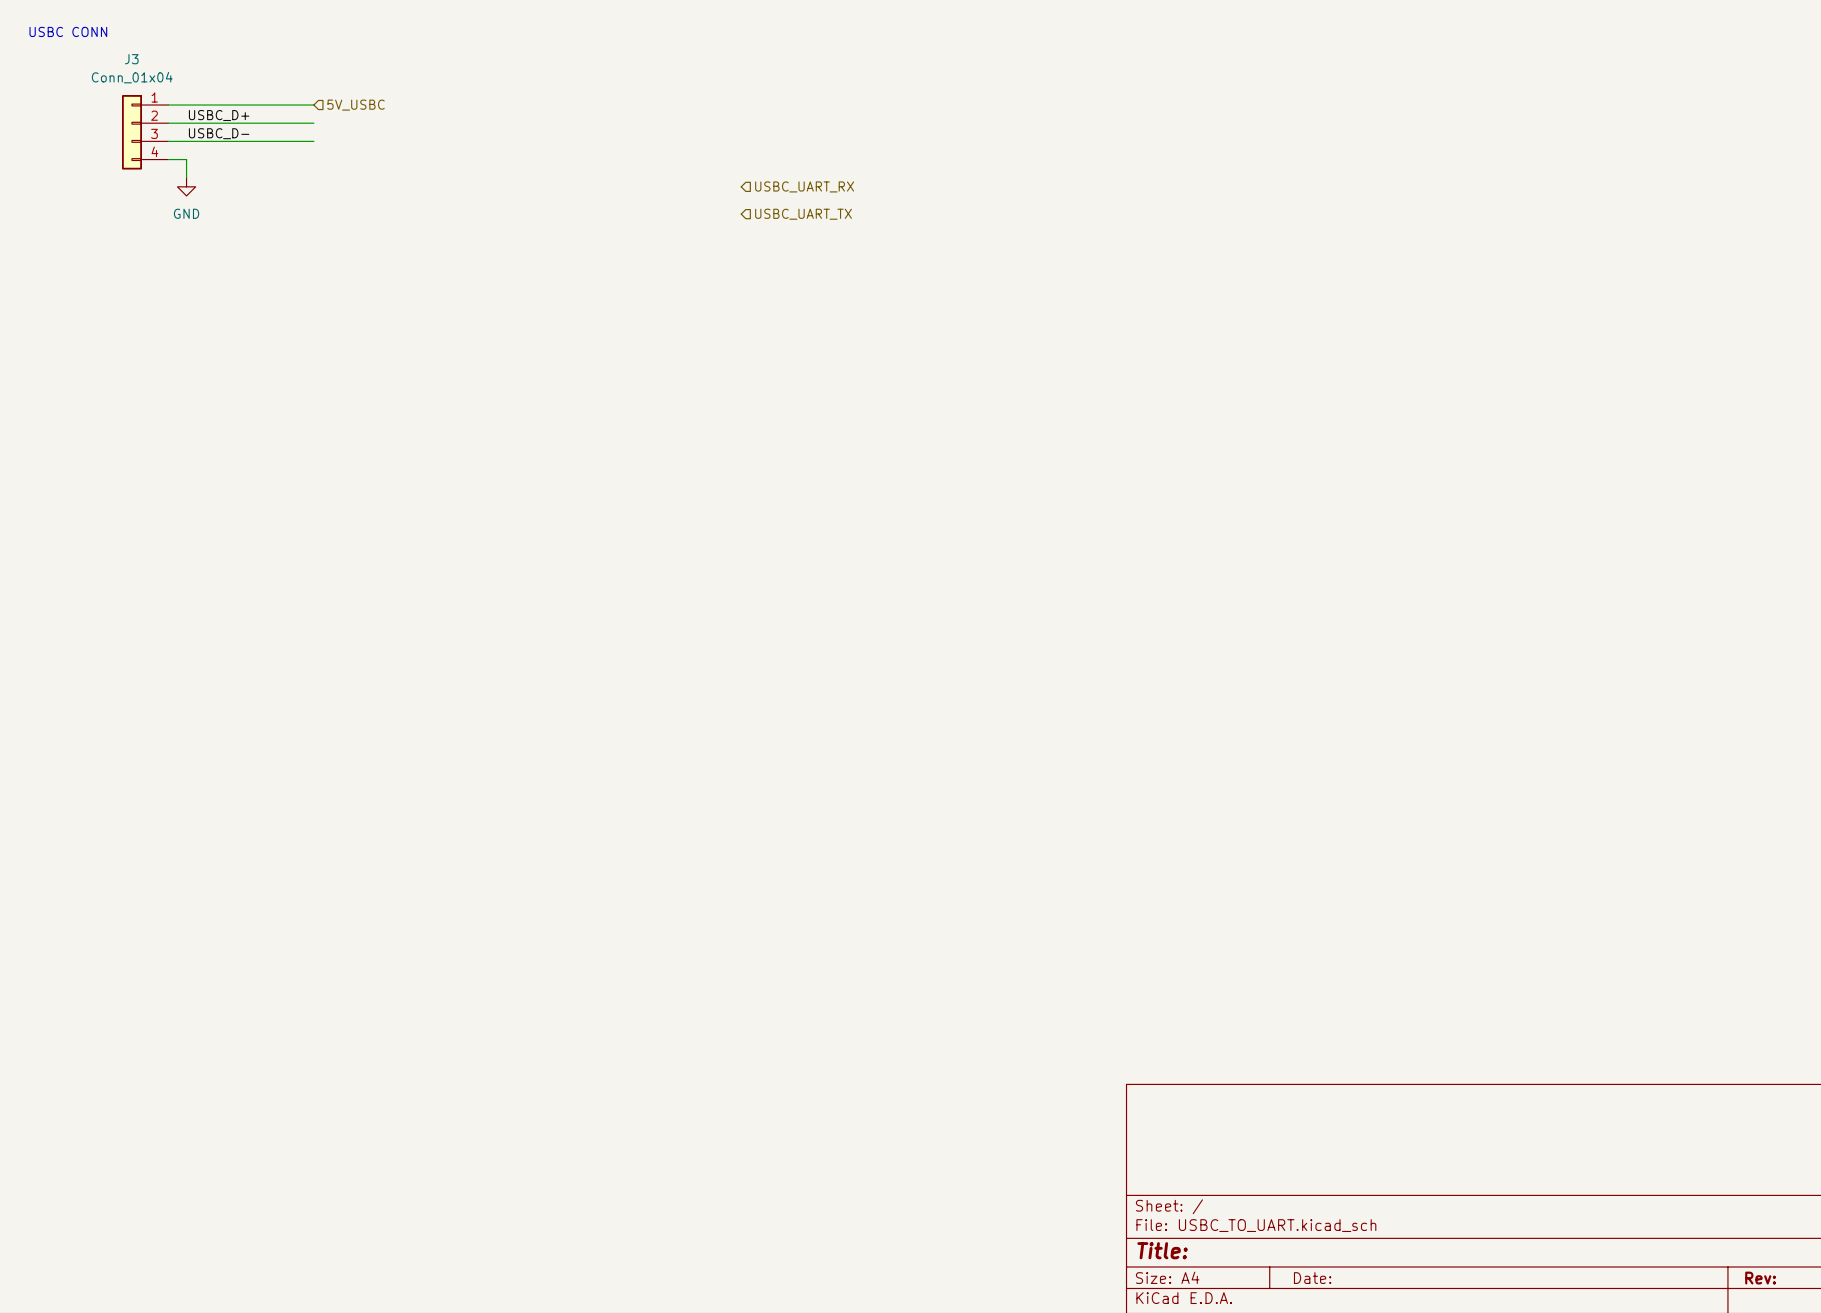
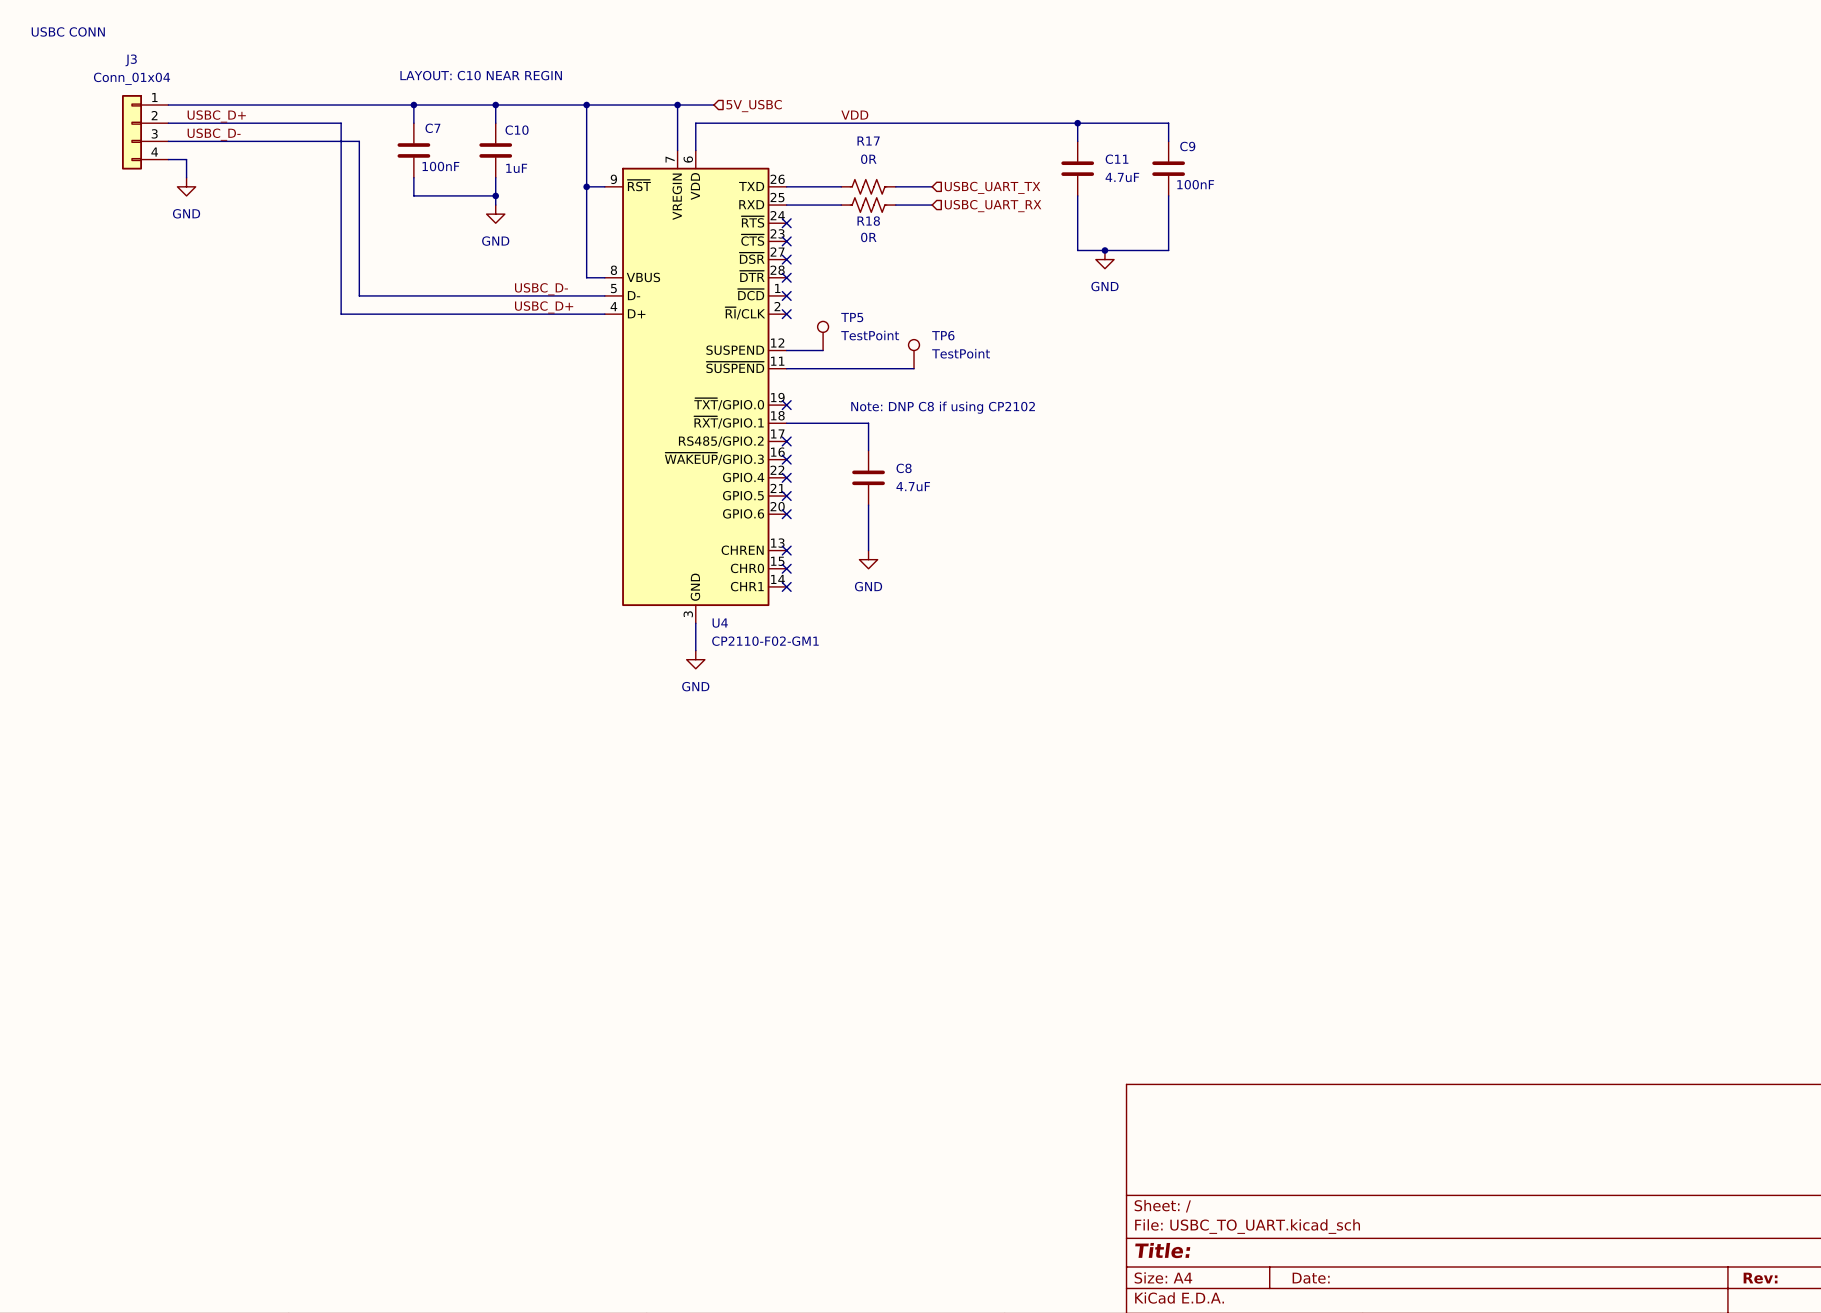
text: none -> LAYOUT: C10 NEAR REGIN (481, 75)
wire: none -> (313, 105) (713, 105)
hierarchical label: 5V_USBC (356, 105) -> none
wire: none -> (413, 105) (413, 123)
junction: none -> (413, 105)
wire: none -> (495, 105) (495, 123)
junction: none -> (495, 105)
wire: none -> (586, 105) (586, 277) (604, 277)
junction: none -> (586, 105)
wire: none -> (677, 105) (677, 150)
junction: none -> (677, 105)
hierarchical label: none -> 5V_USBC (754, 106)
label: none -> VDD (854, 115)
wire: none -> (313, 123) (341, 123) (341, 314) (604, 314)
wire: none -> (1077, 123) (1077, 141)
junction: none -> (1077, 123)
wire: none -> (313, 141) (359, 141) (359, 295) (604, 295)
wire: none -> (1168, 141) (1168, 123) (695, 123) (695, 150)
C7: none -> 100nF (413, 150)
C10: none -> 1uF (495, 150)
C11: none -> 4.7uF (1077, 168)
C9: none -> 100nF (1168, 168)
wire: none -> (413, 177) (413, 195) (495, 195)
wire: none -> (495, 177) (495, 205)
wire: none -> (586, 186) (604, 186)
junction: none -> (586, 186)
wire: none -> (786, 186) (841, 186)
hierarchical label: USBC_UART_RX (804, 186) -> none
R17: none -> 0R (868, 186)
wire: none -> (895, 186) (932, 186)
hierarchical label: none -> USBC_UART_TX (992, 187)
junction: none -> (495, 195)
wire: none -> (1077, 195) (1077, 250) (1168, 250) (1168, 195)
wire: none -> (786, 205) (841, 205)
R18: none -> 0R (868, 205)
wire: none -> (895, 205) (932, 205)
hierarchical label: none -> USBC_UART_RX (993, 206)
power symbol: none -> GND (495, 214)
hierarchical label: USBC_UART_TX (803, 214) -> none
no-connect mark: none -> (786, 223)
no-connect mark: none -> (786, 241)
junction: none -> (1104, 250)
no-connect mark: none -> (786, 259)
power symbol: none -> GND (1104, 259)
no-connect mark: none -> (786, 277)
label: none -> USBC_D- (541, 289)
no-connect mark: none -> (786, 295)
label: none -> USBC_D+ (544, 307)
no-connect mark: none -> (786, 314)
TP5: none -> TestPoint (823, 335)
wire: none -> (786, 350) (823, 350)
TP6: none -> TestPoint (914, 354)
wire: none -> (786, 368) (914, 368)
U4: none -> CP2110-F02-GM1 (695, 386)
no-connect mark: none -> (786, 405)
text: none -> Note: DNP C8 if using CP2102 (943, 407)
wire: none -> (786, 423) (868, 423) (868, 450)
no-connect mark: none -> (786, 441)
no-connect mark: none -> (786, 459)
no-connect mark: none -> (786, 477)
C8: none -> 4.7uF (868, 477)
no-connect mark: none -> (786, 496)
wire: none -> (868, 505) (868, 550)
no-connect mark: none -> (786, 514)
no-connect mark: none -> (786, 550)
power symbol: none -> GND (868, 559)
no-connect mark: none -> (786, 568)
no-connect mark: none -> (786, 586)
wire: none -> (695, 623) (695, 650)
power symbol: none -> GND (695, 659)

